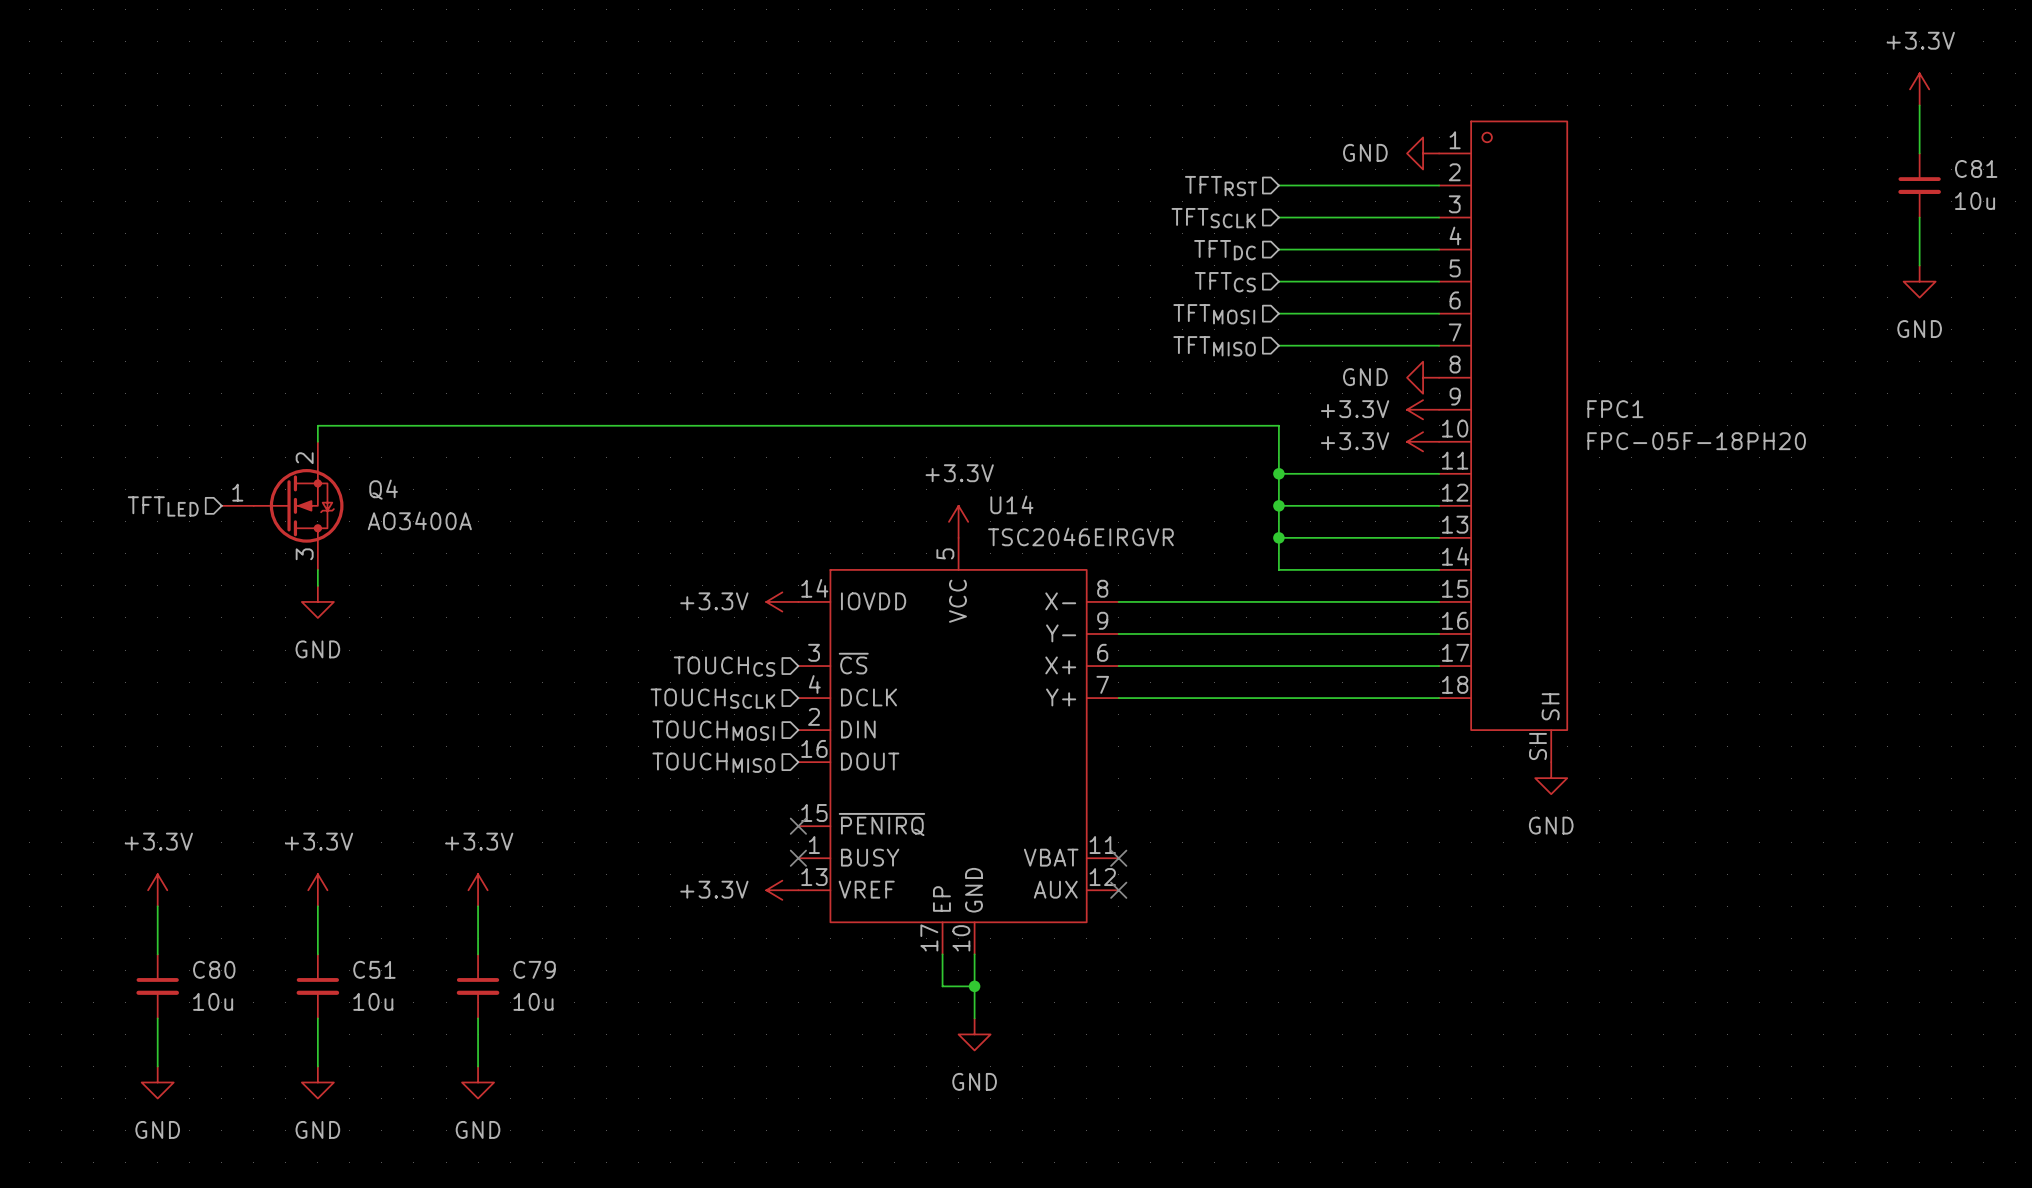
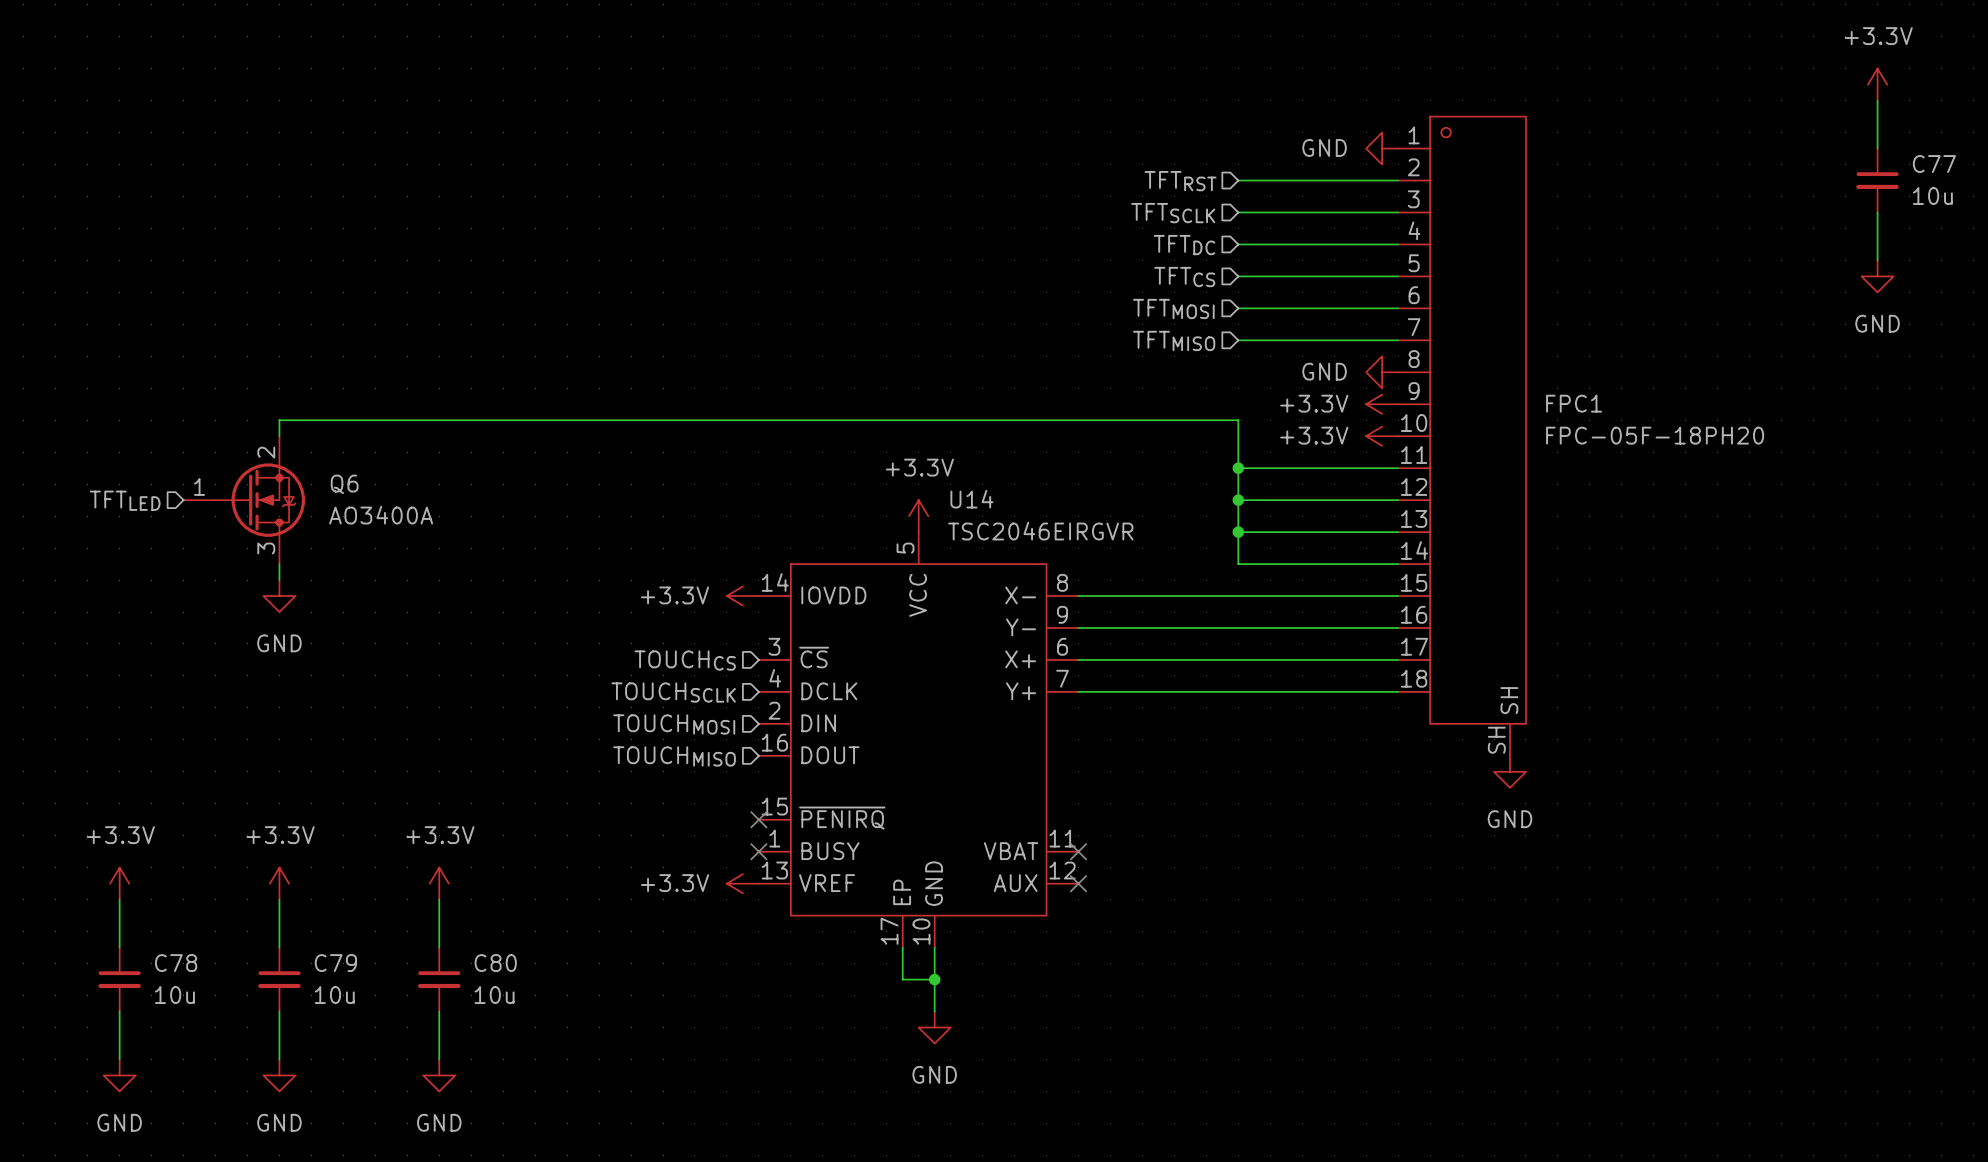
C81 name: C81 (1976, 168) -> C77 (1934, 164)
Q4 name: Q4 (383, 489) -> Q6 (344, 484)
C80 name: C80 (214, 969) -> C78 (176, 963)
C51 name: C51 (374, 969) -> C79 (335, 963)
C79 name: C79 (534, 969) -> C80 (495, 963)

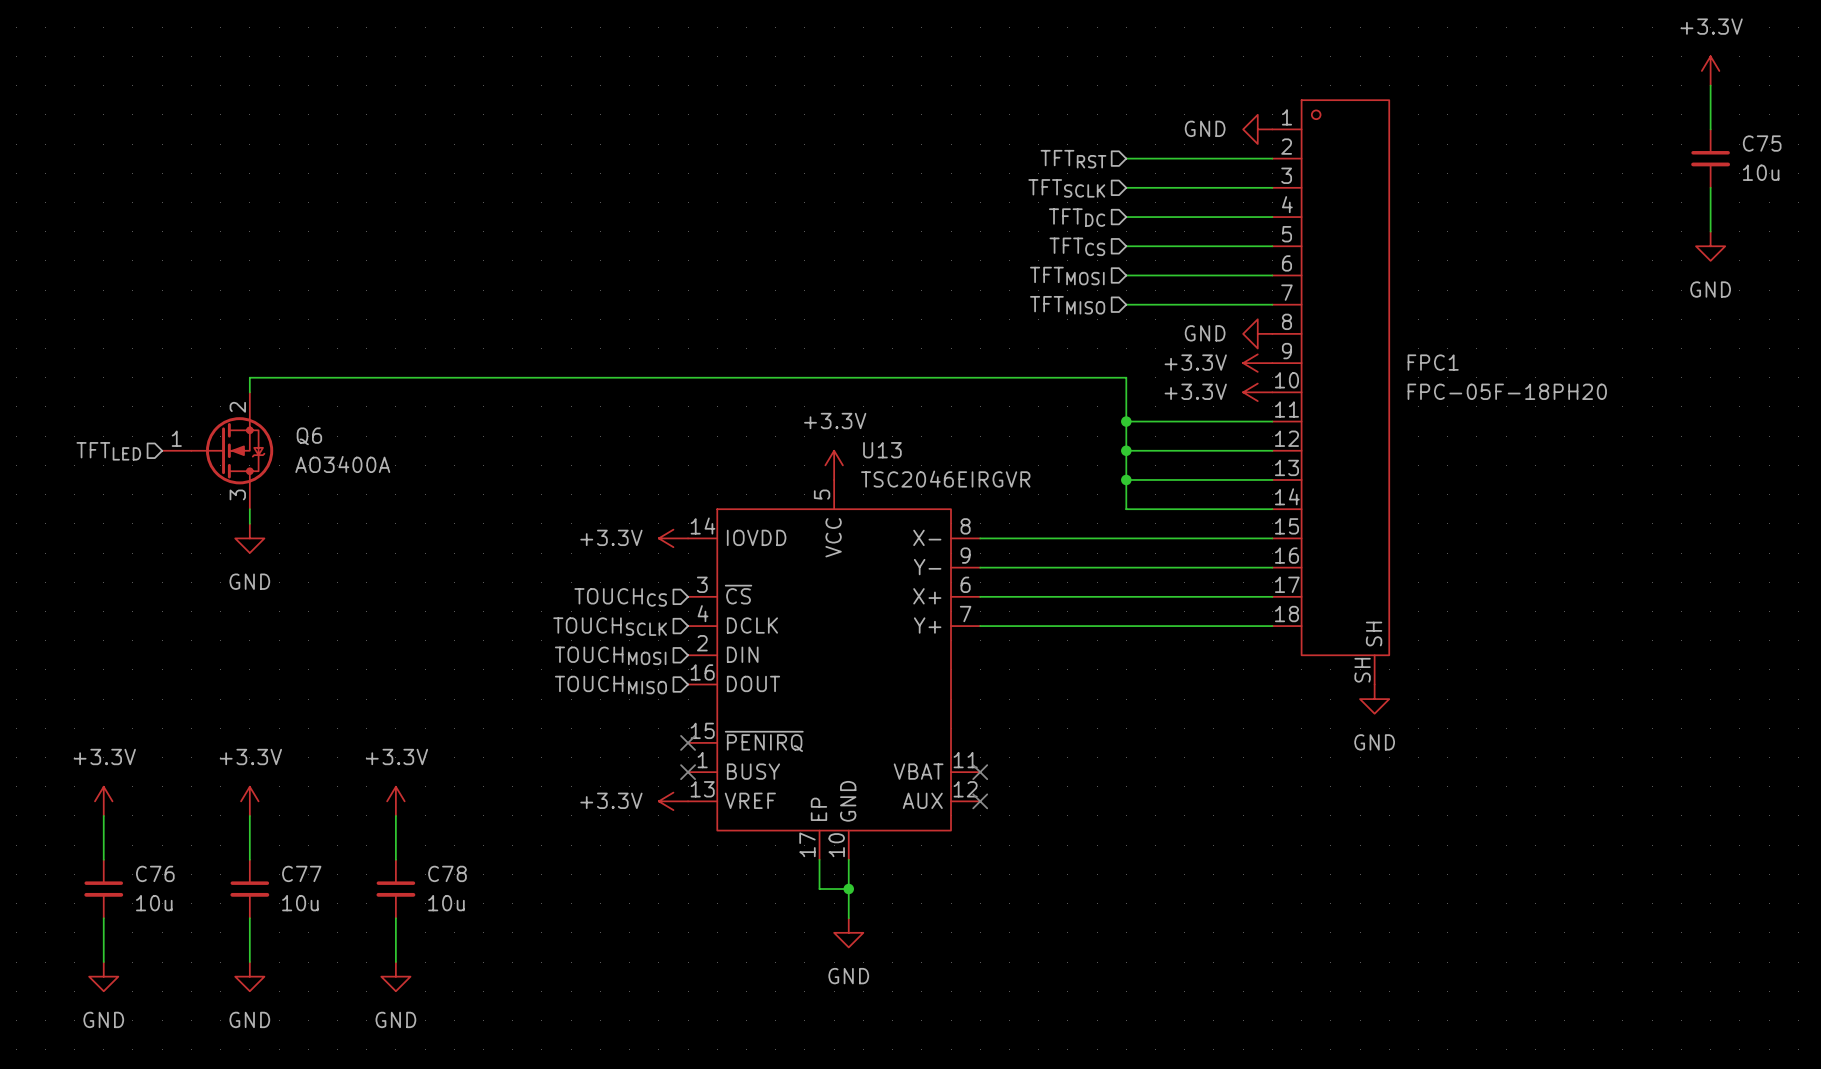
C77 name: C77 (1934, 164) -> C75 (1762, 143)
U14 name: U14 (971, 499) -> U13 (882, 450)
C78 name: C78 (176, 963) -> C76 (155, 873)
C79 name: C79 (335, 963) -> C77 (301, 873)
C80 name: C80 (495, 963) -> C78 (447, 873)

